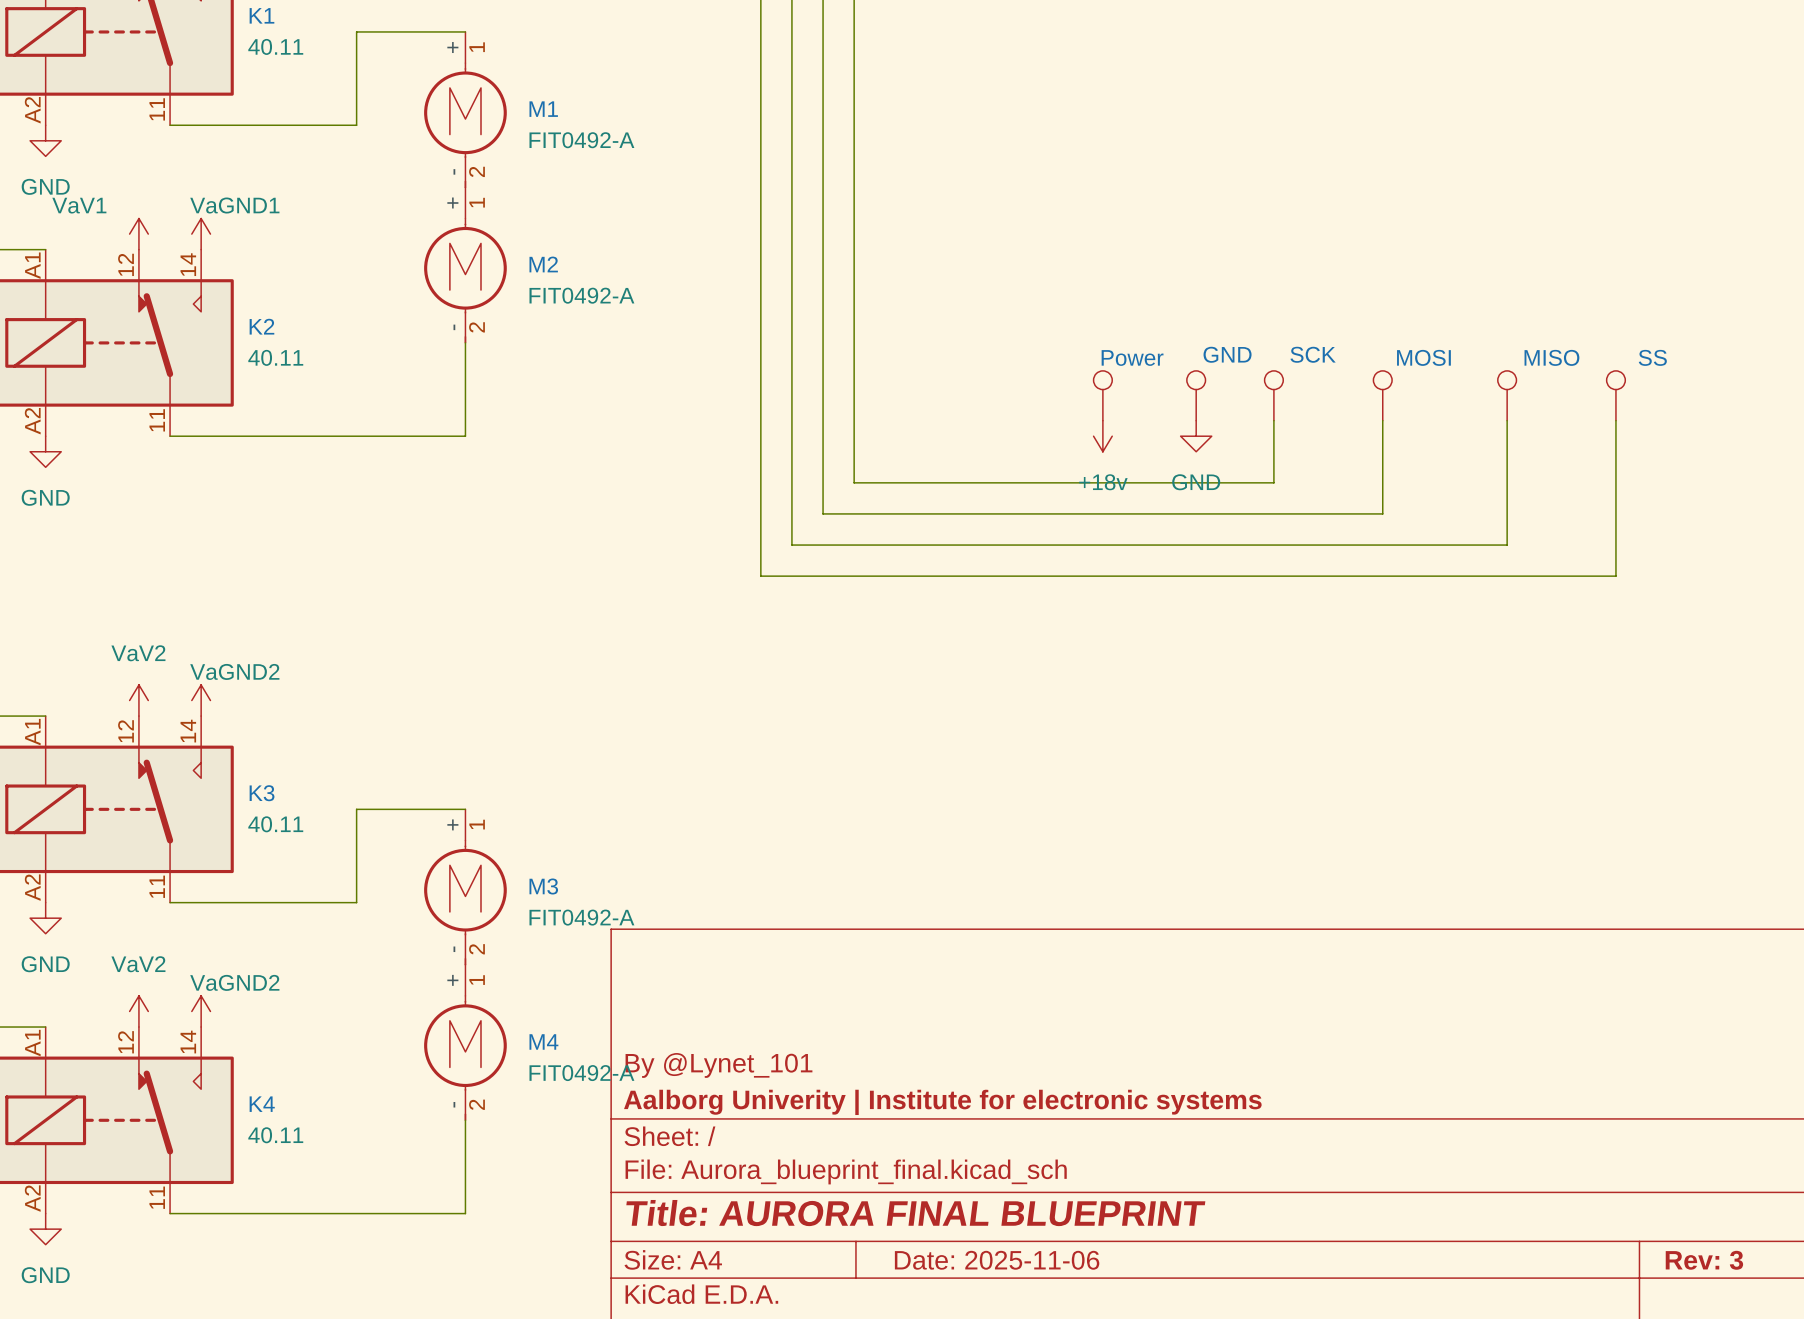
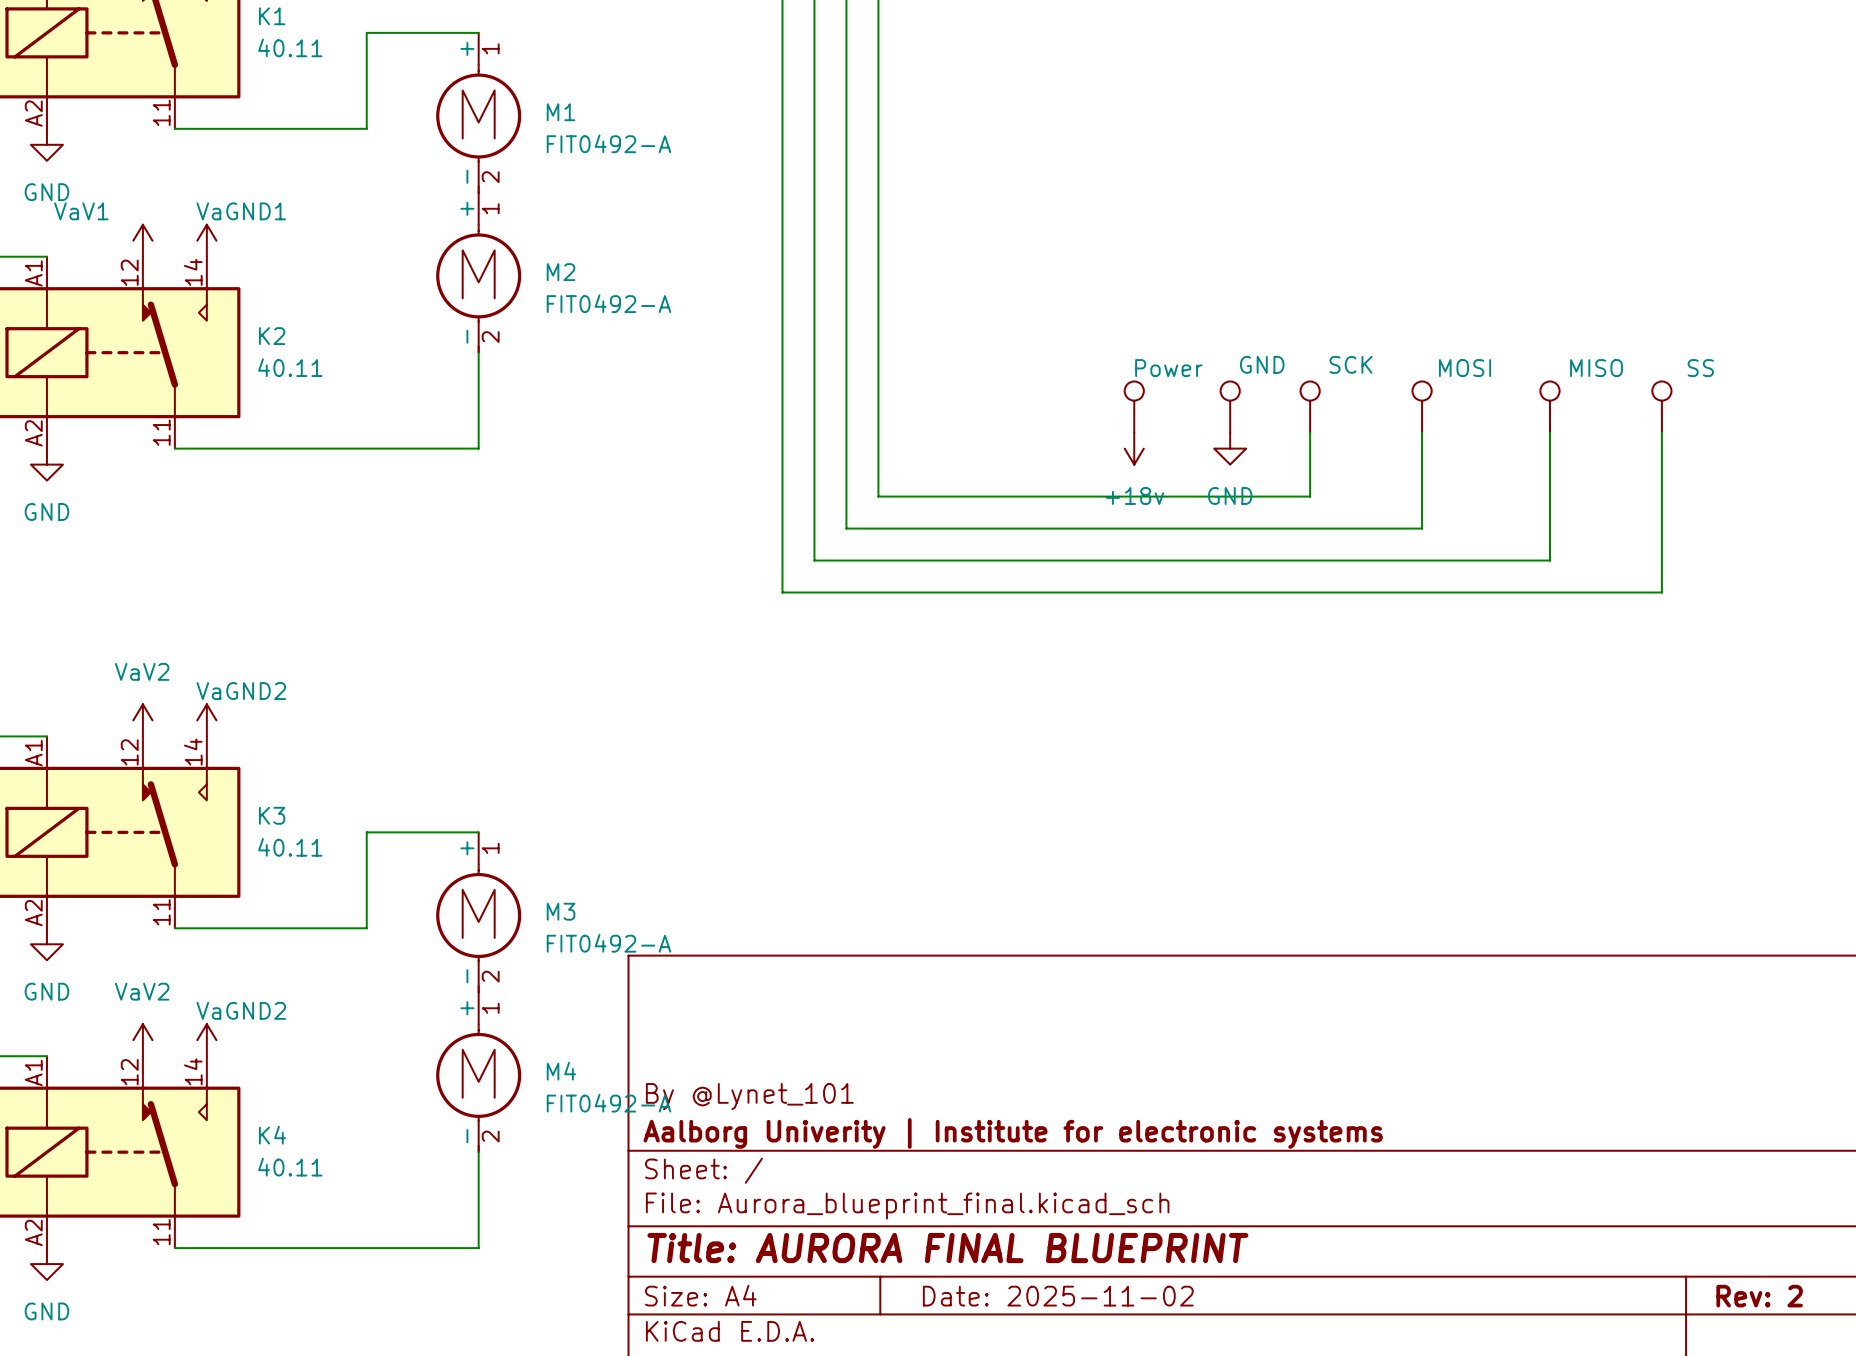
title block: Date: 2025-11-06 (997, 1260) -> Date: 2025-11-02 (1058, 1296)
title block: Rev: 3 (1704, 1260) -> Rev: 2 (1759, 1296)

